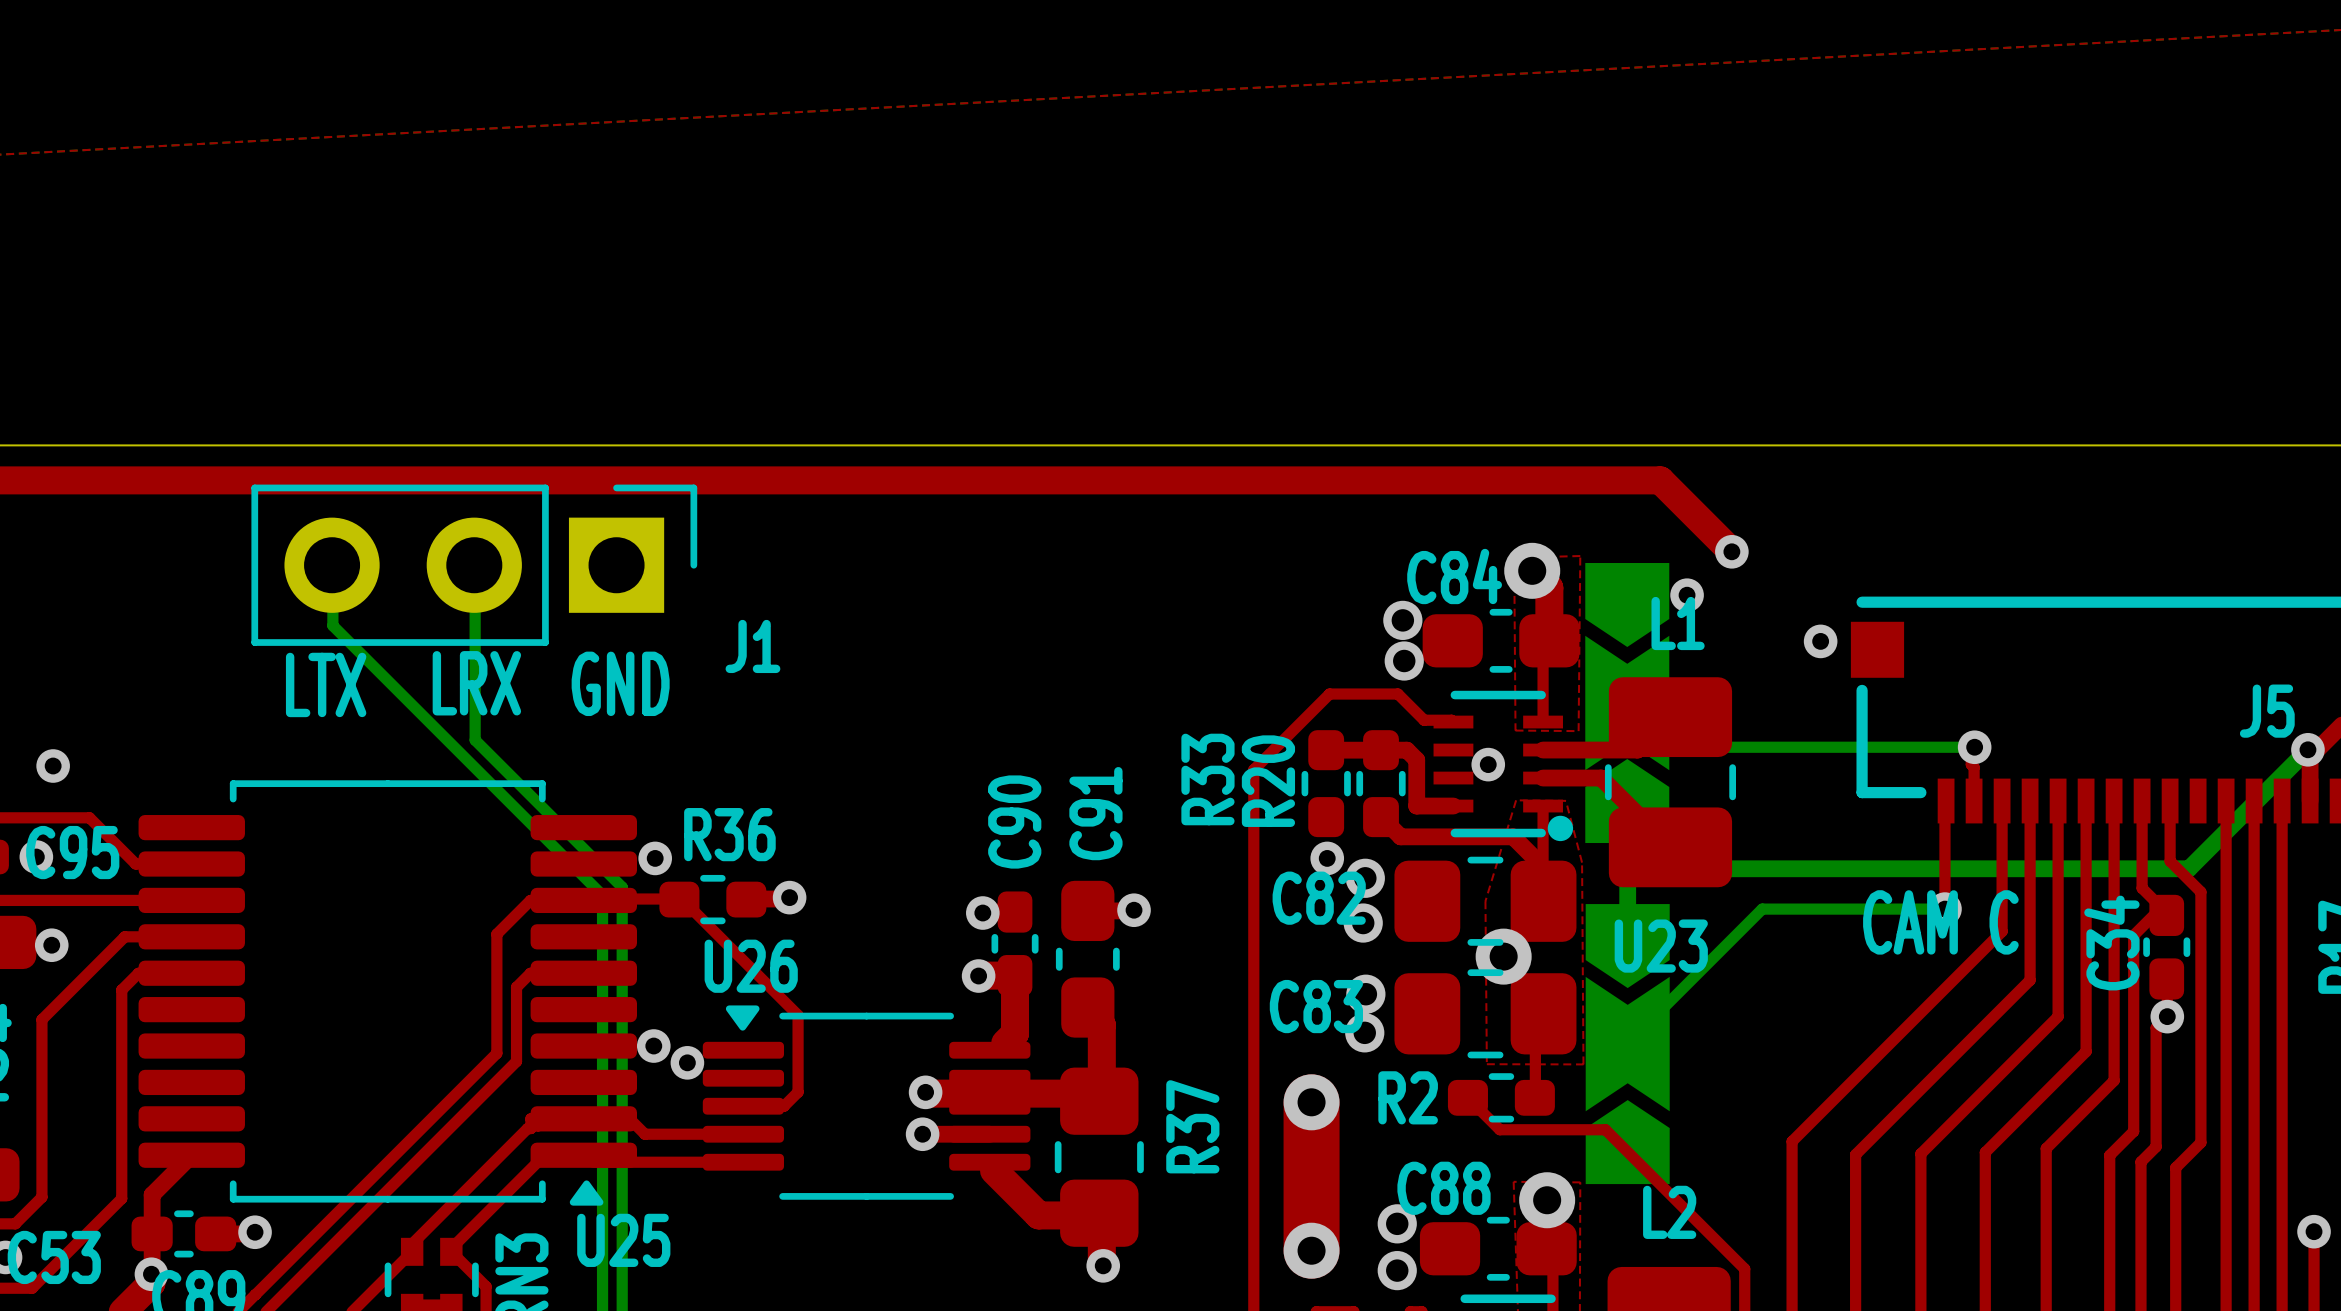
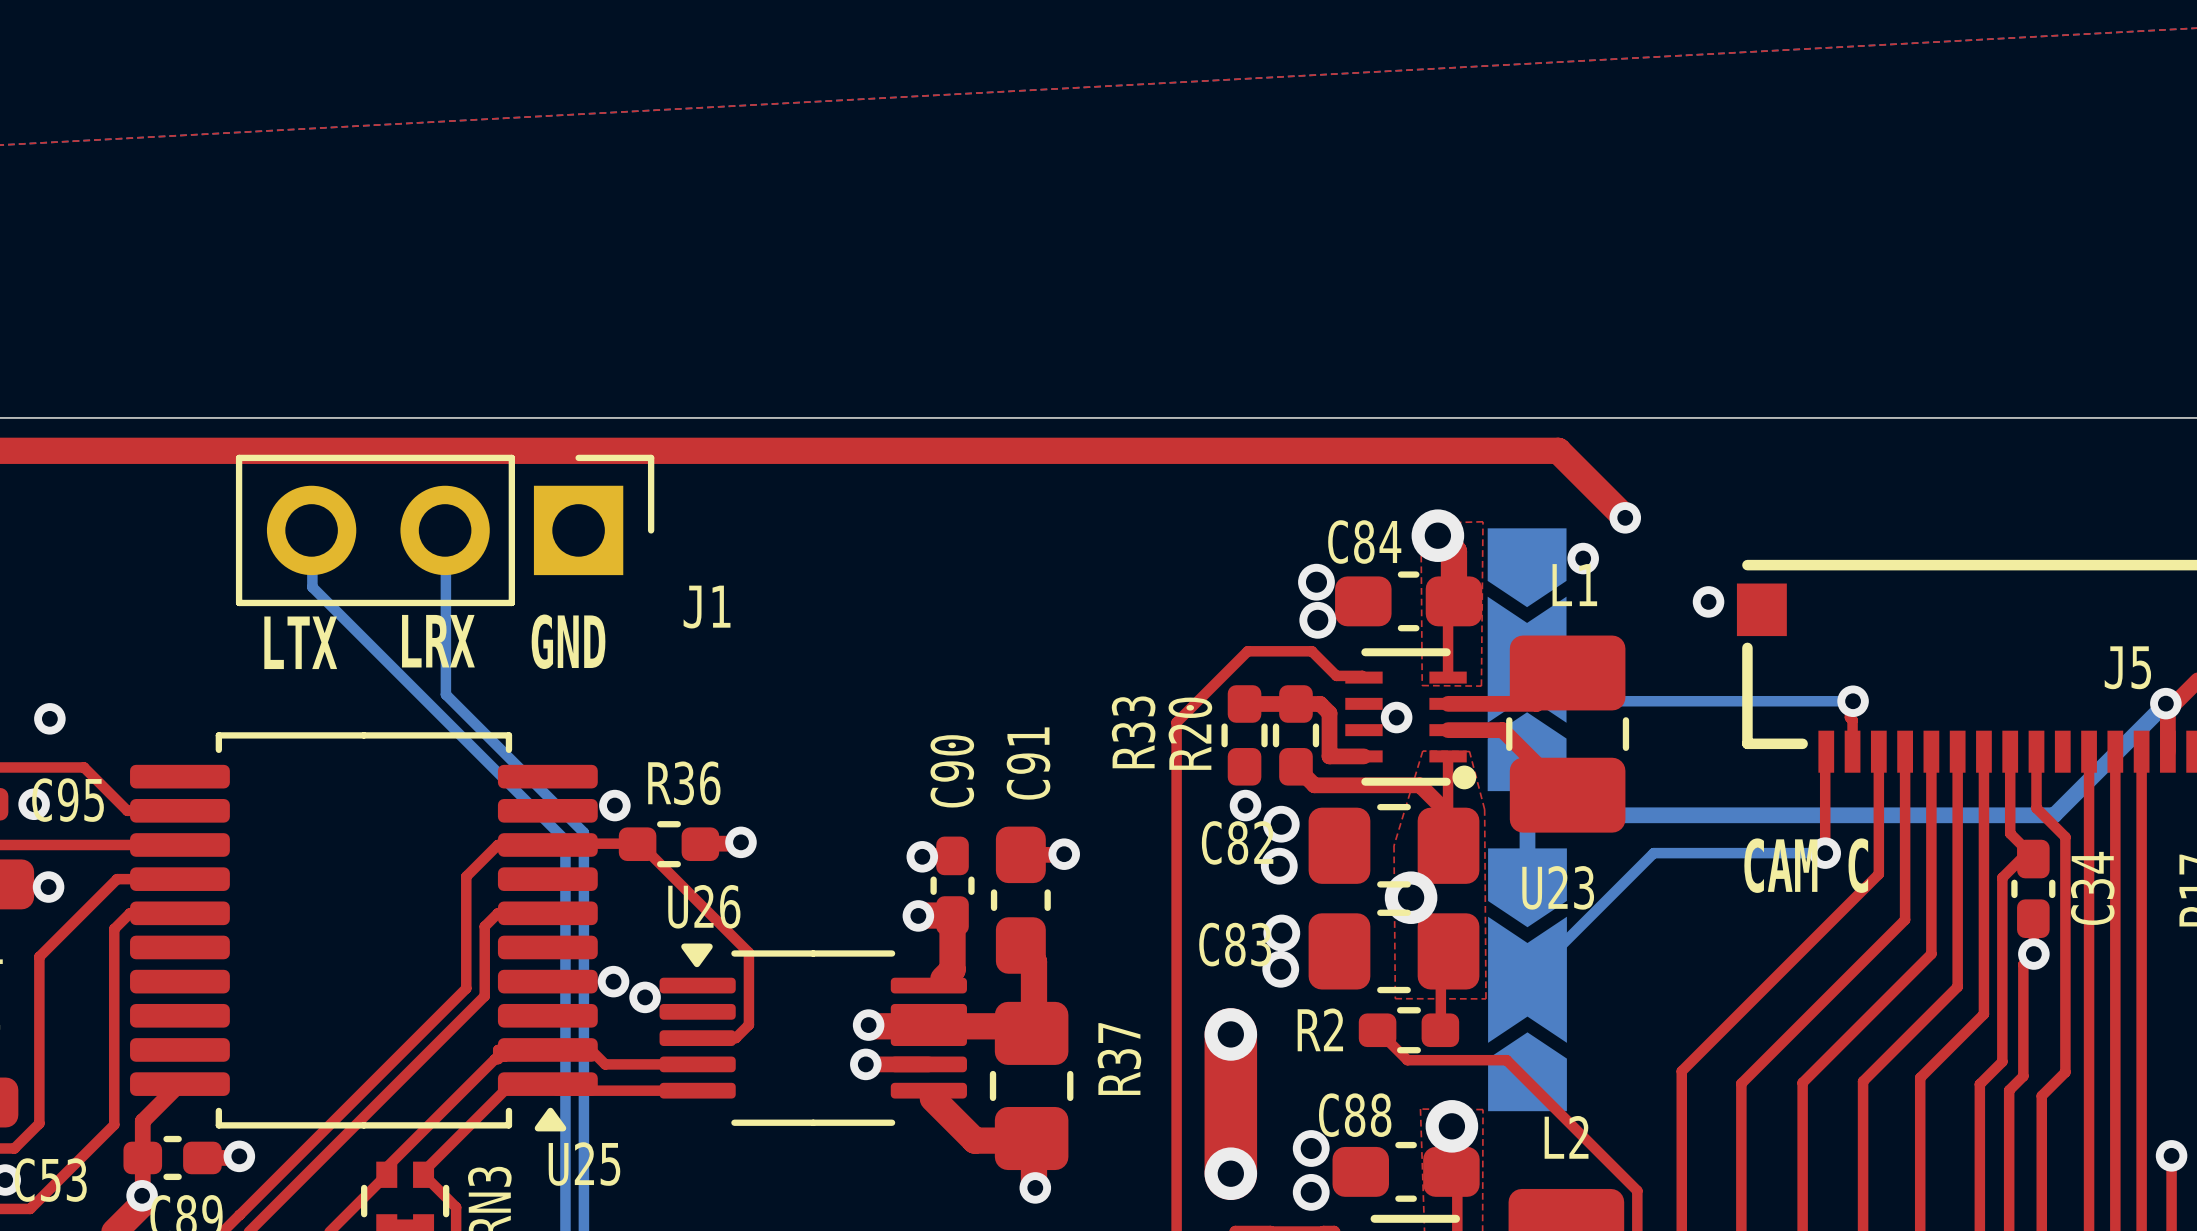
C34 name position: C34 (2111, 943) -> C34 (2092, 888)

